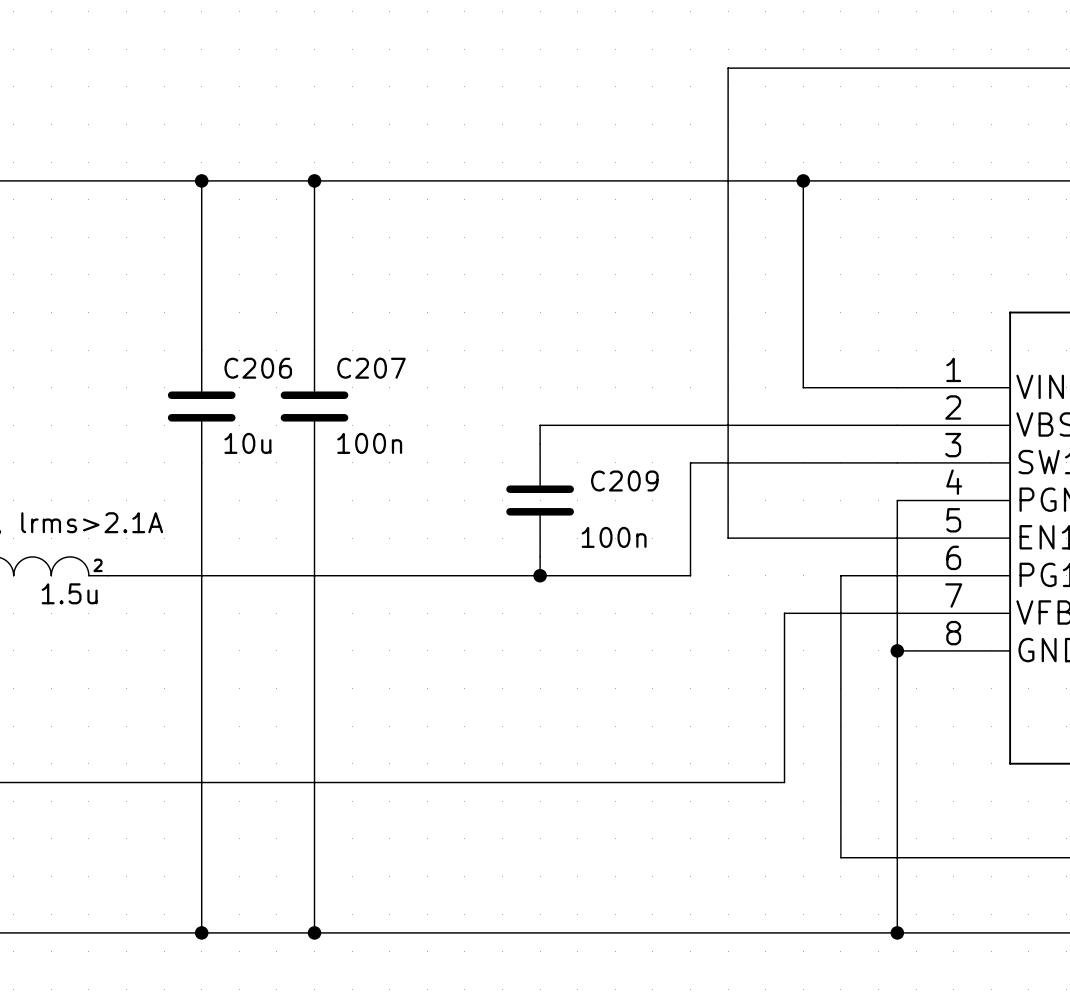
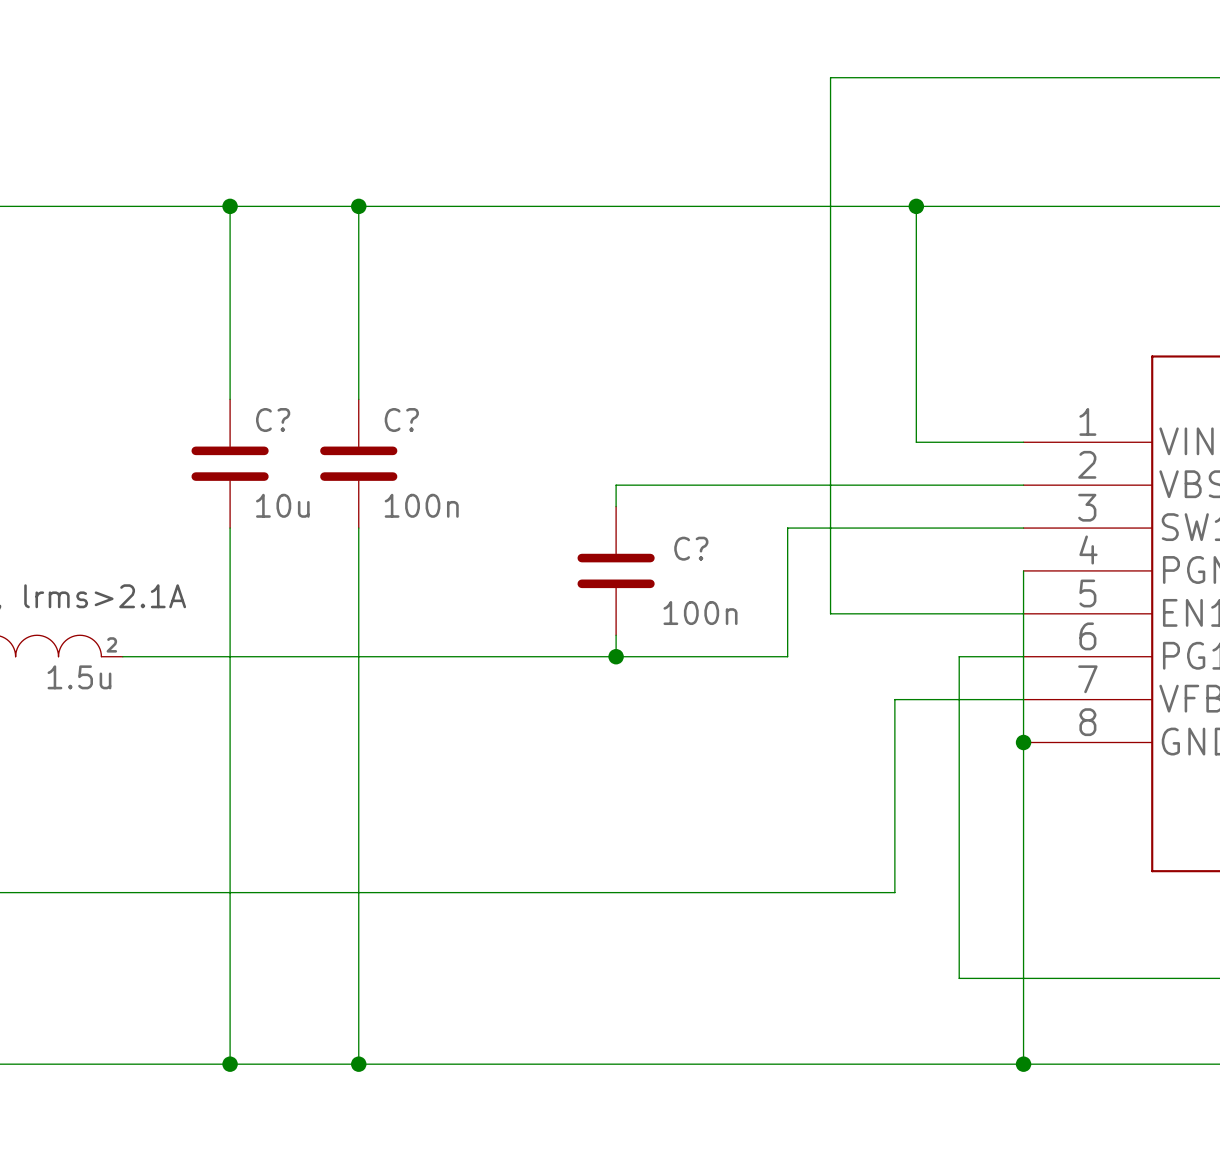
C206 name: C206 (258, 368) -> C? (273, 420)
C207 name: C207 (371, 368) -> C? (401, 420)
C209 name: C209 (624, 481) -> C? (691, 548)

